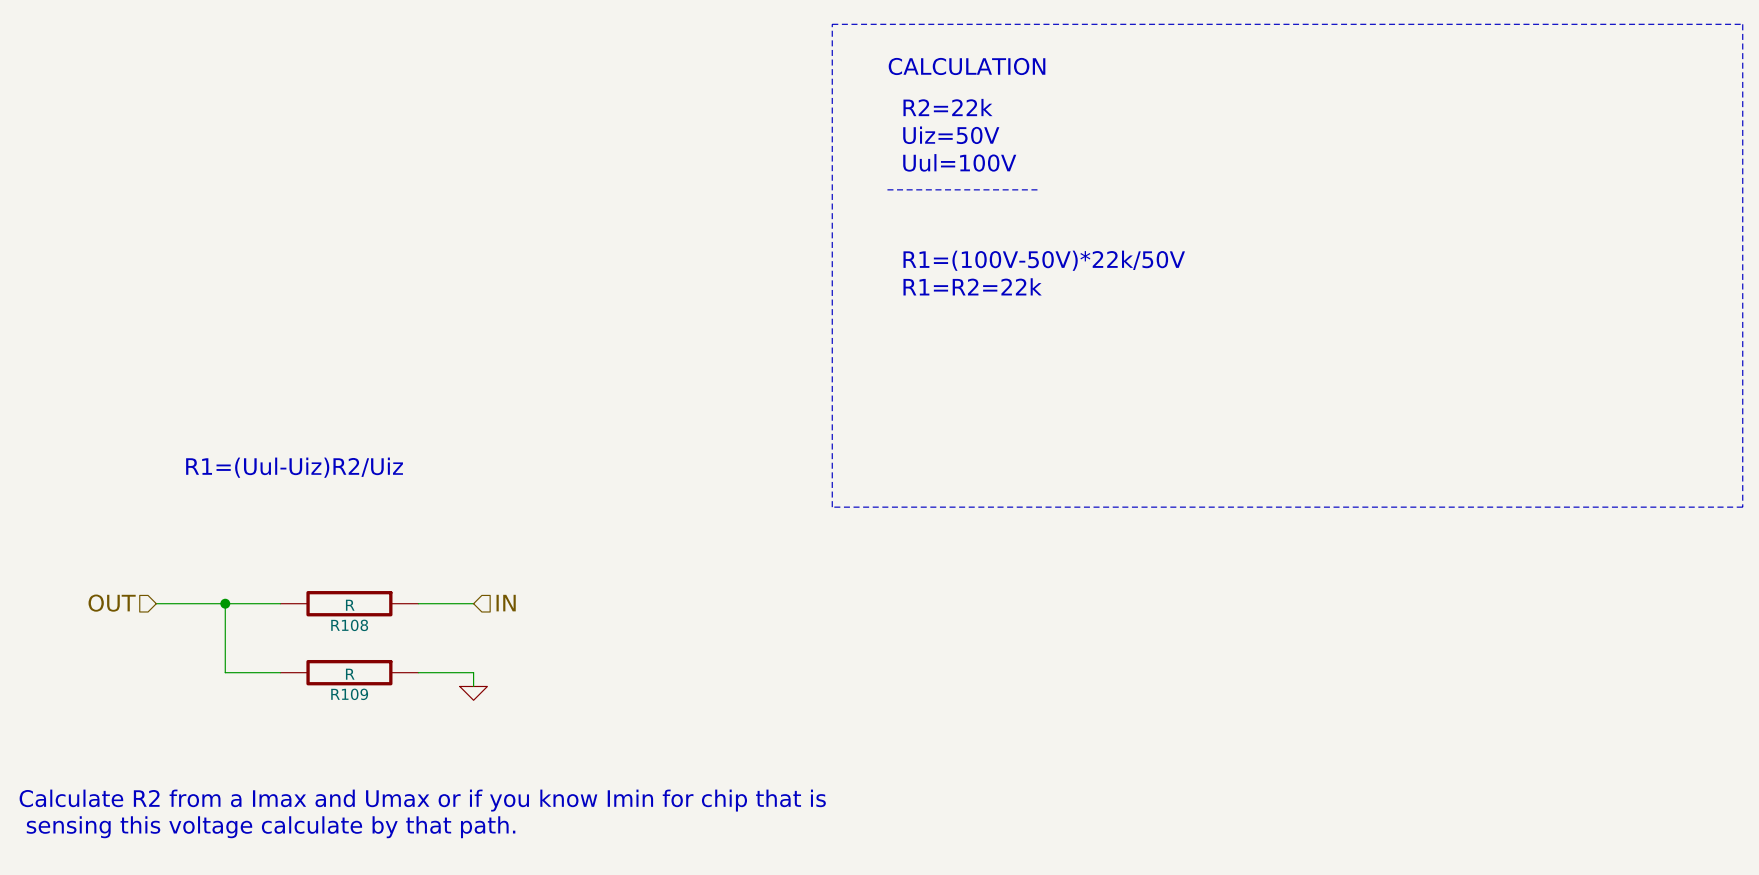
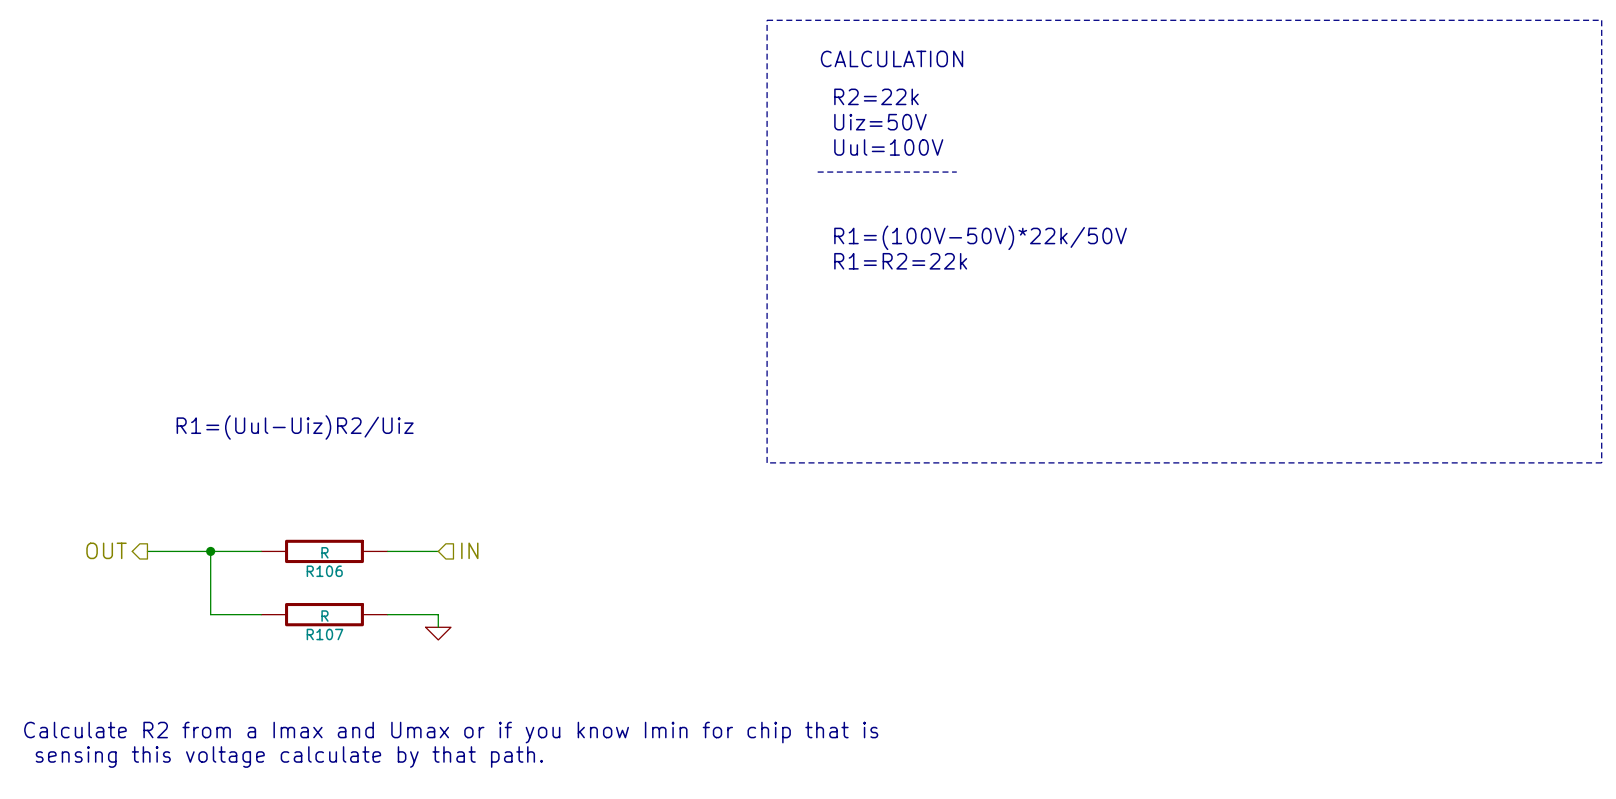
hierarchical label shape: input (112, 603) -> output (106, 550)
R108 name: R108 (349, 625) -> R106 (324, 571)
R109 name: R109 (349, 694) -> R107 (324, 634)

